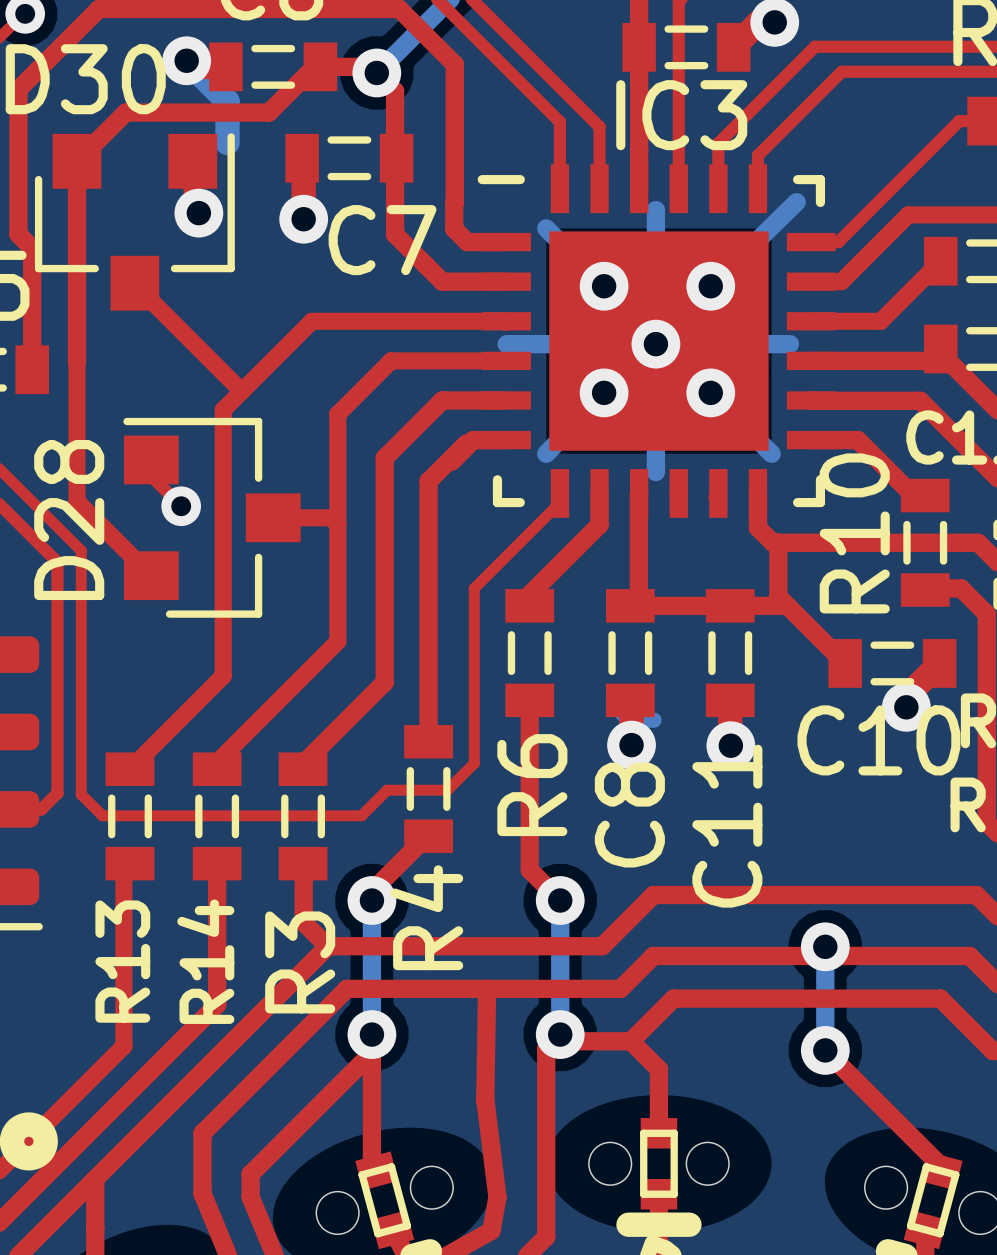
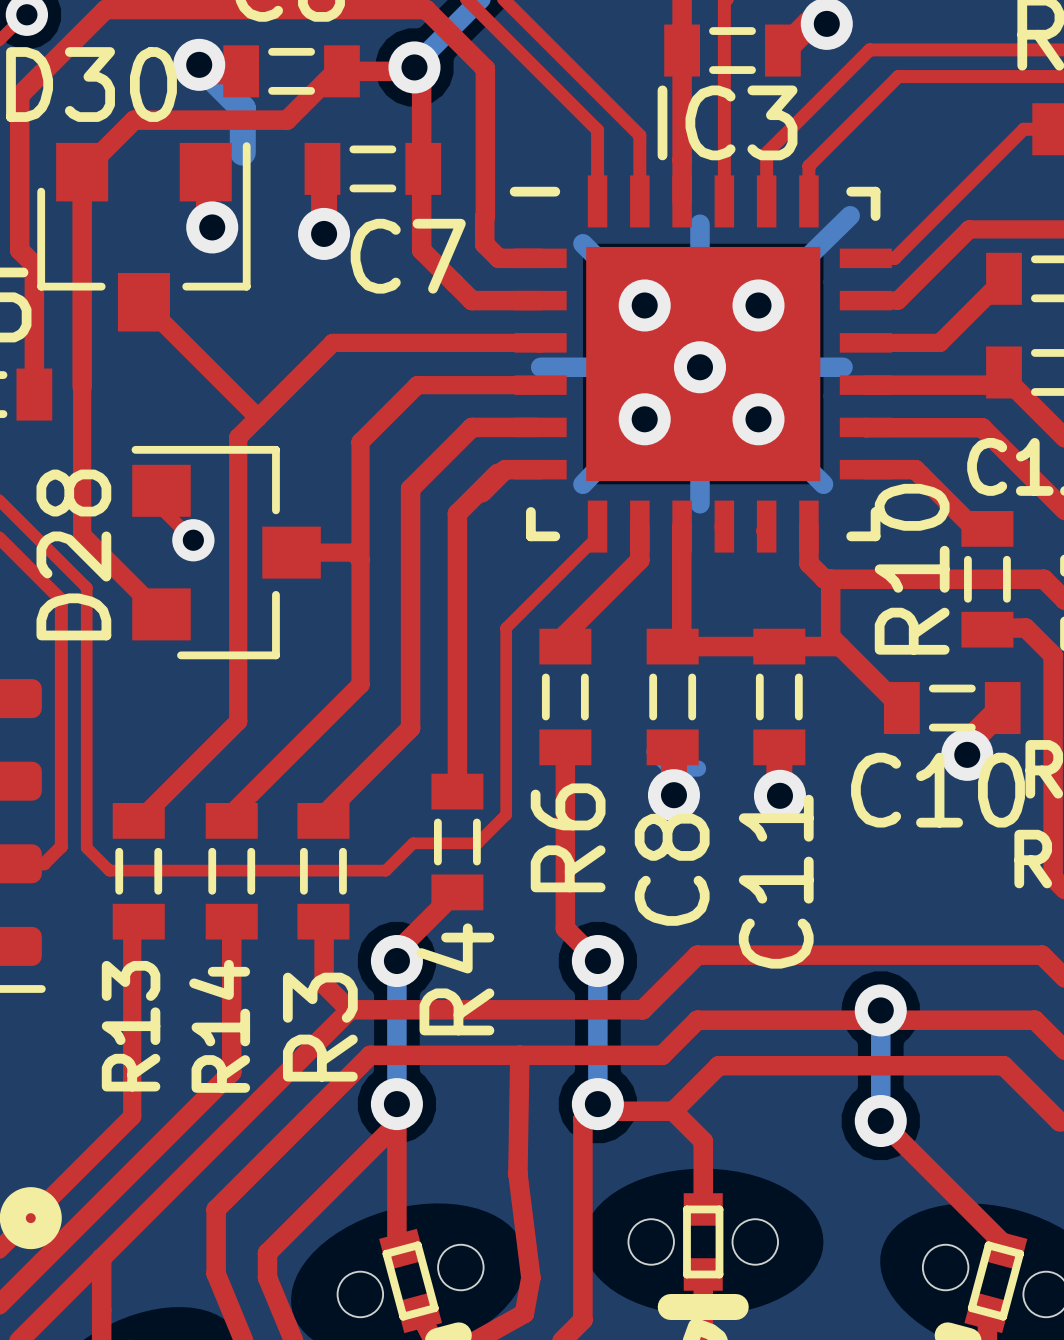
via position: (376, 72) -> (414, 67)

